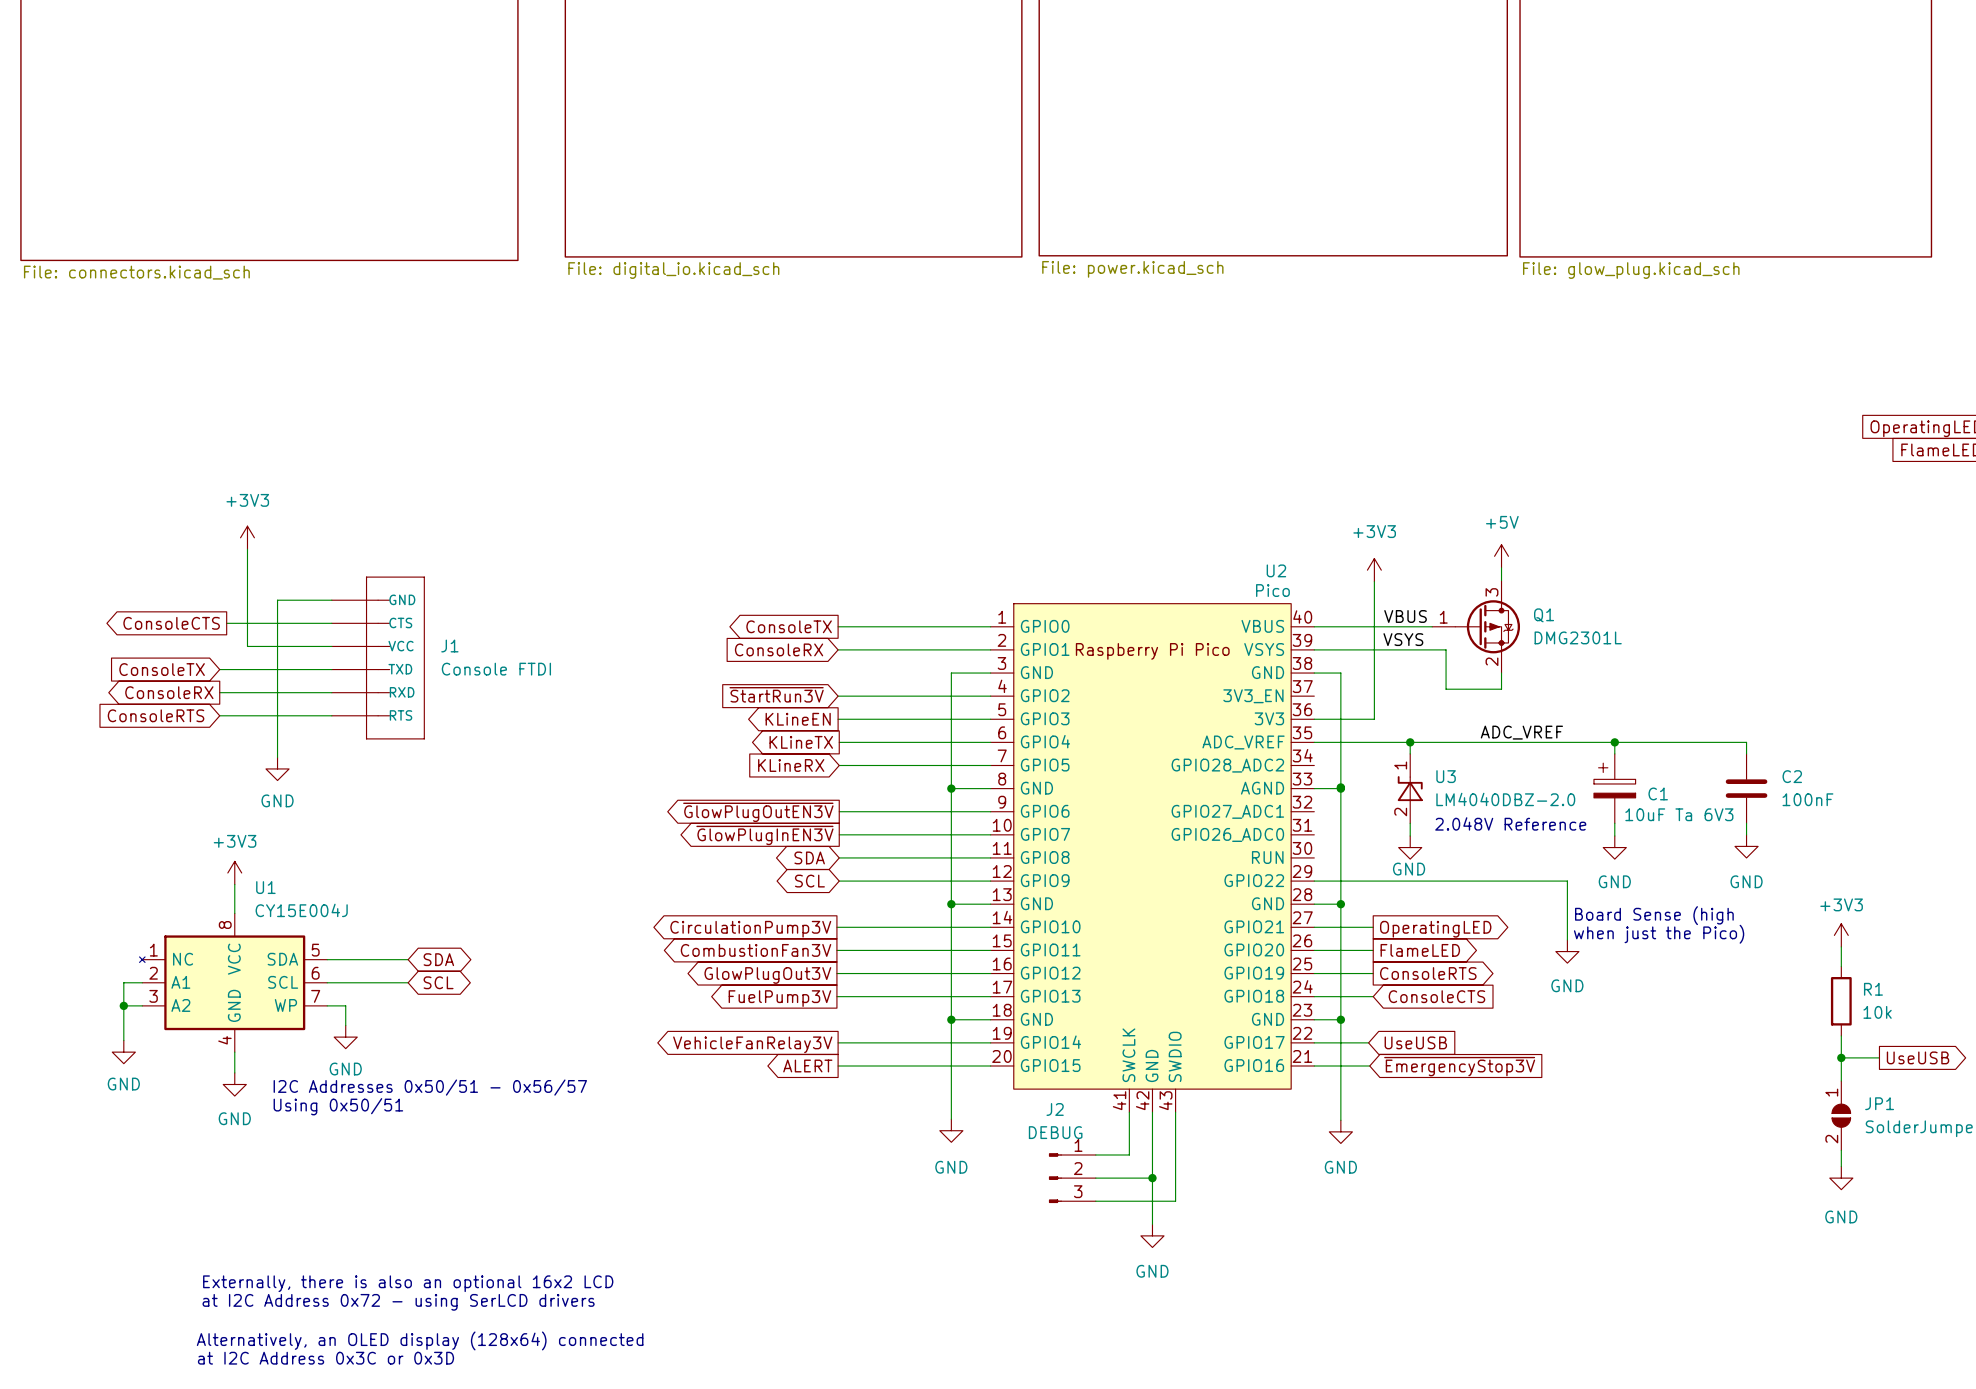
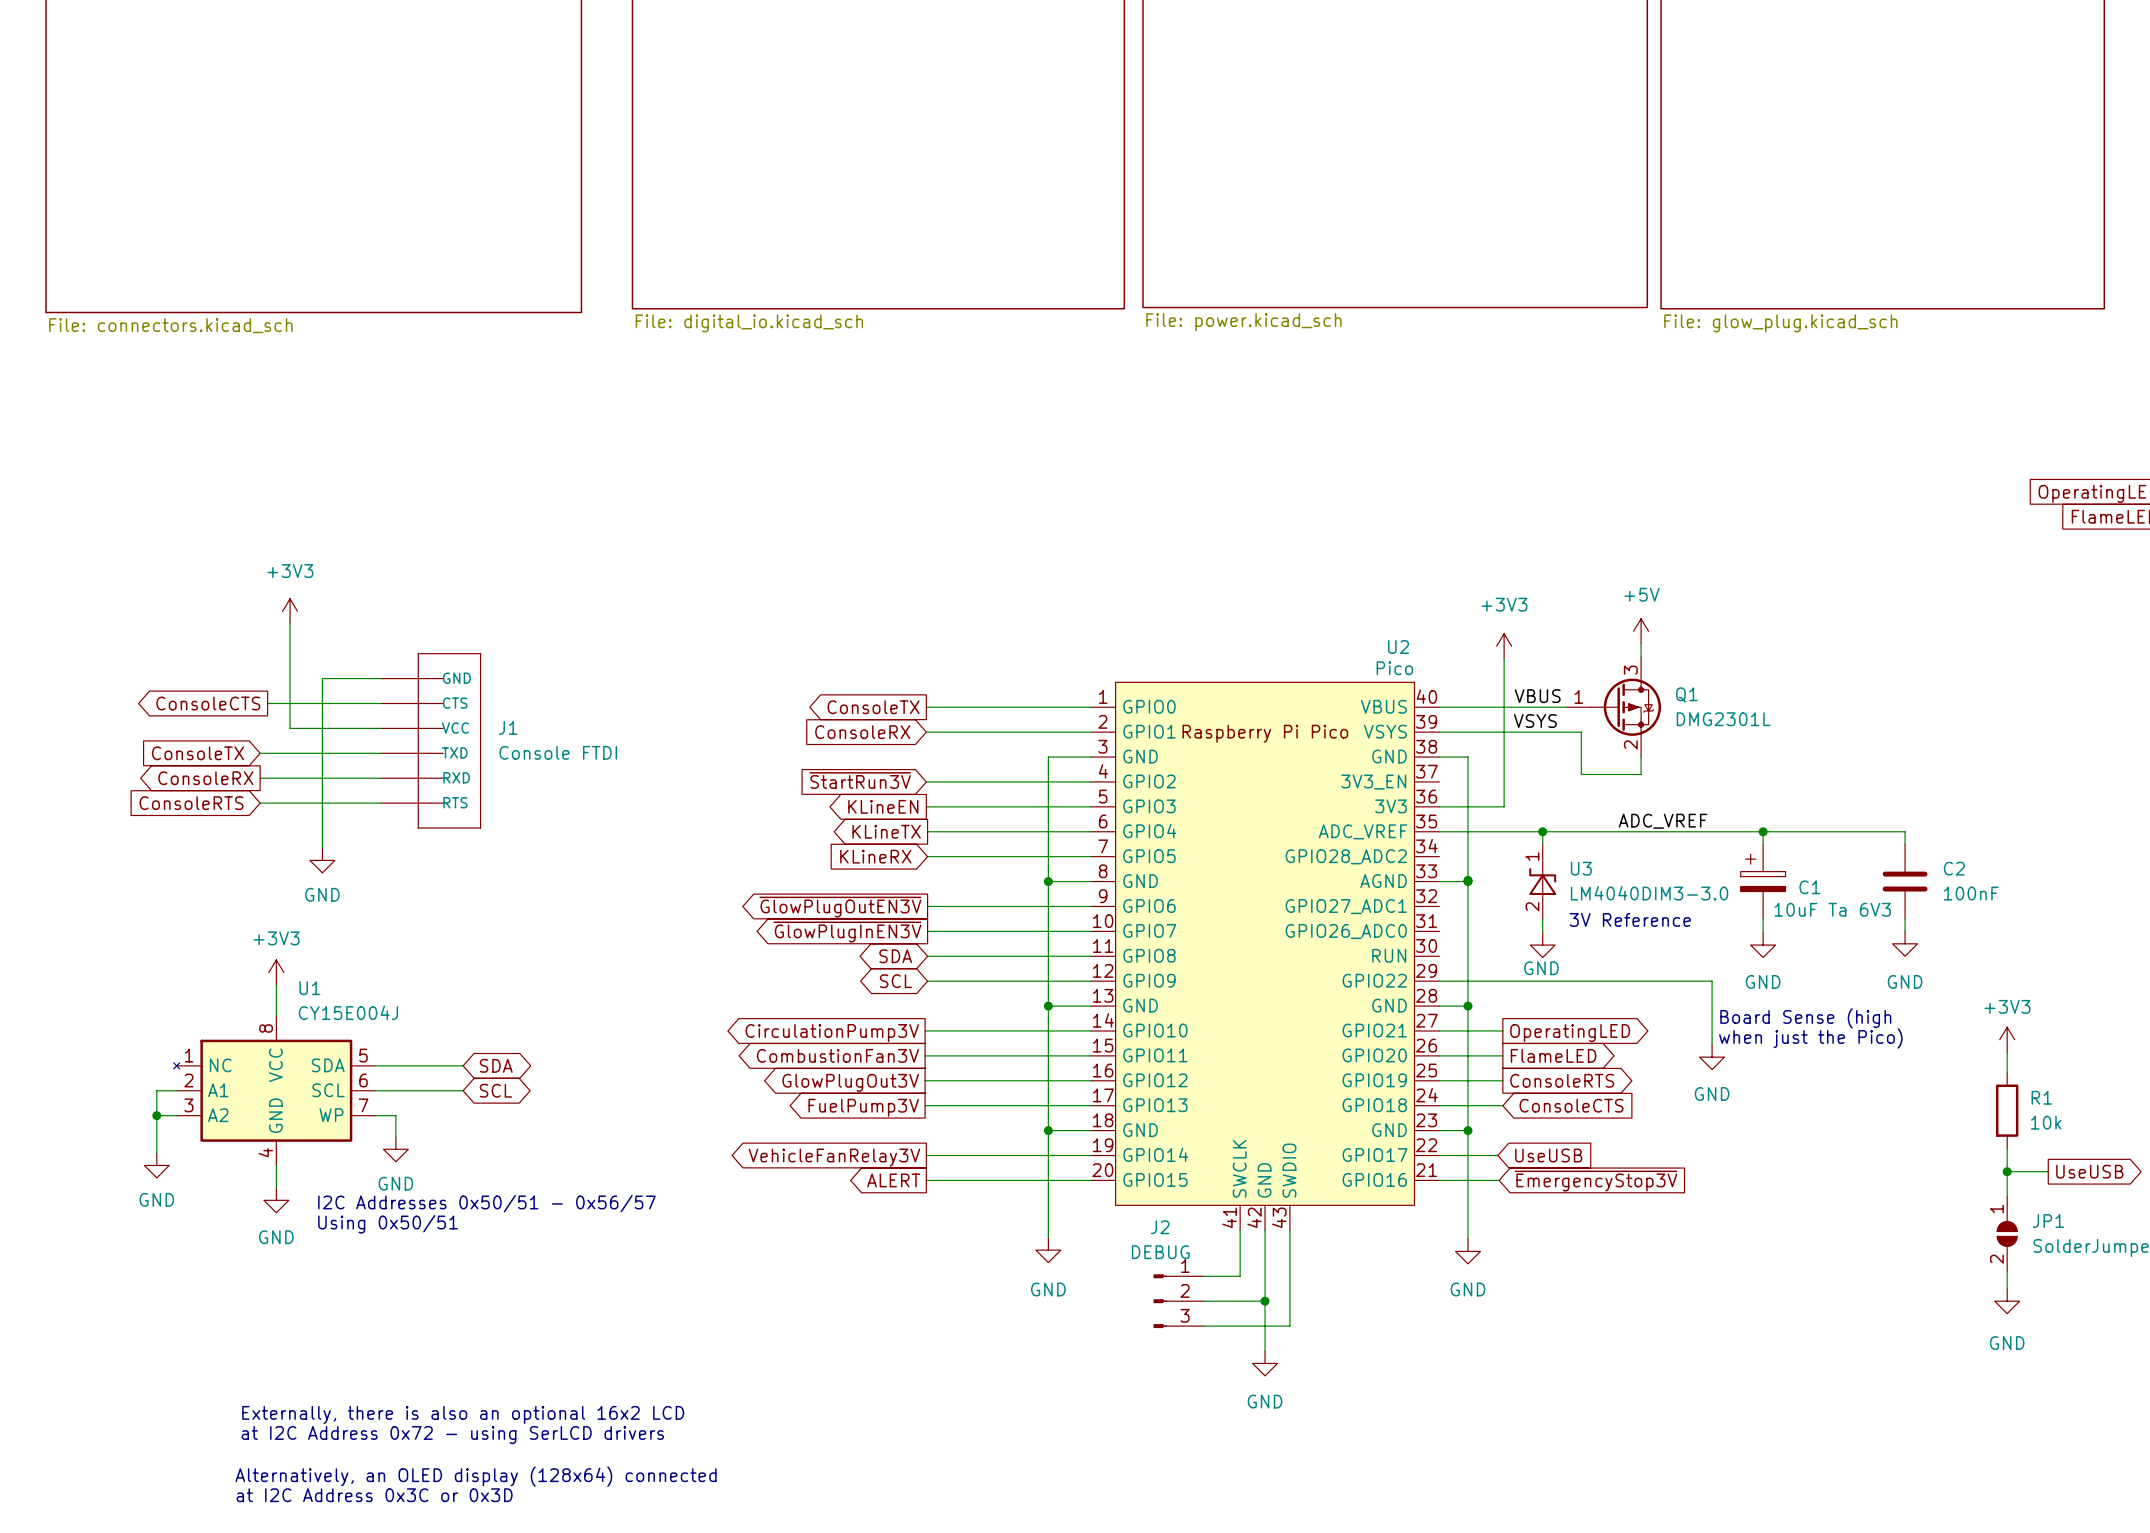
U3 value: LM4040DBZ-2.0 (1505, 799) -> LM4040DIM3-3.0 (1649, 893)
text: 2.048V Reference (1510, 823) -> 3V Reference (1630, 919)

